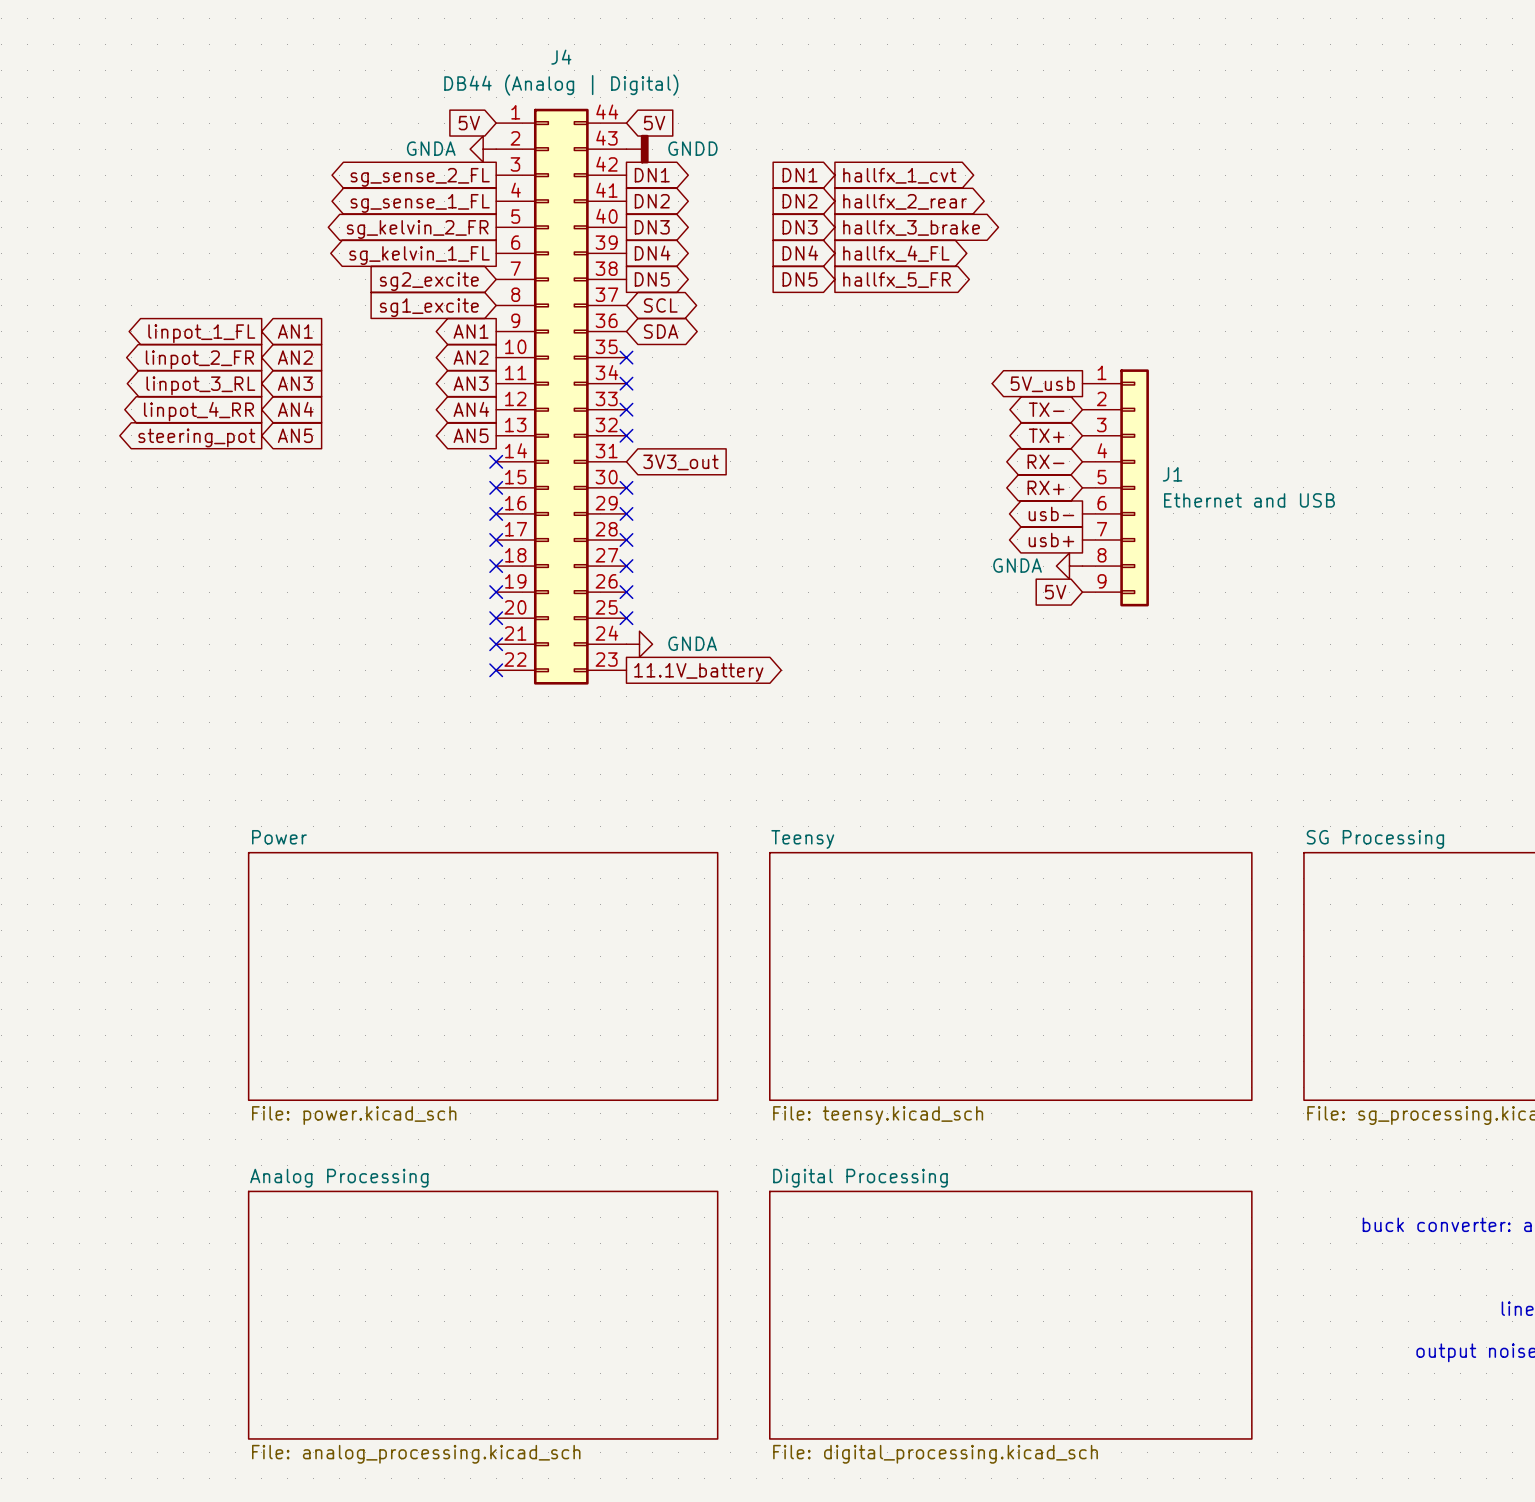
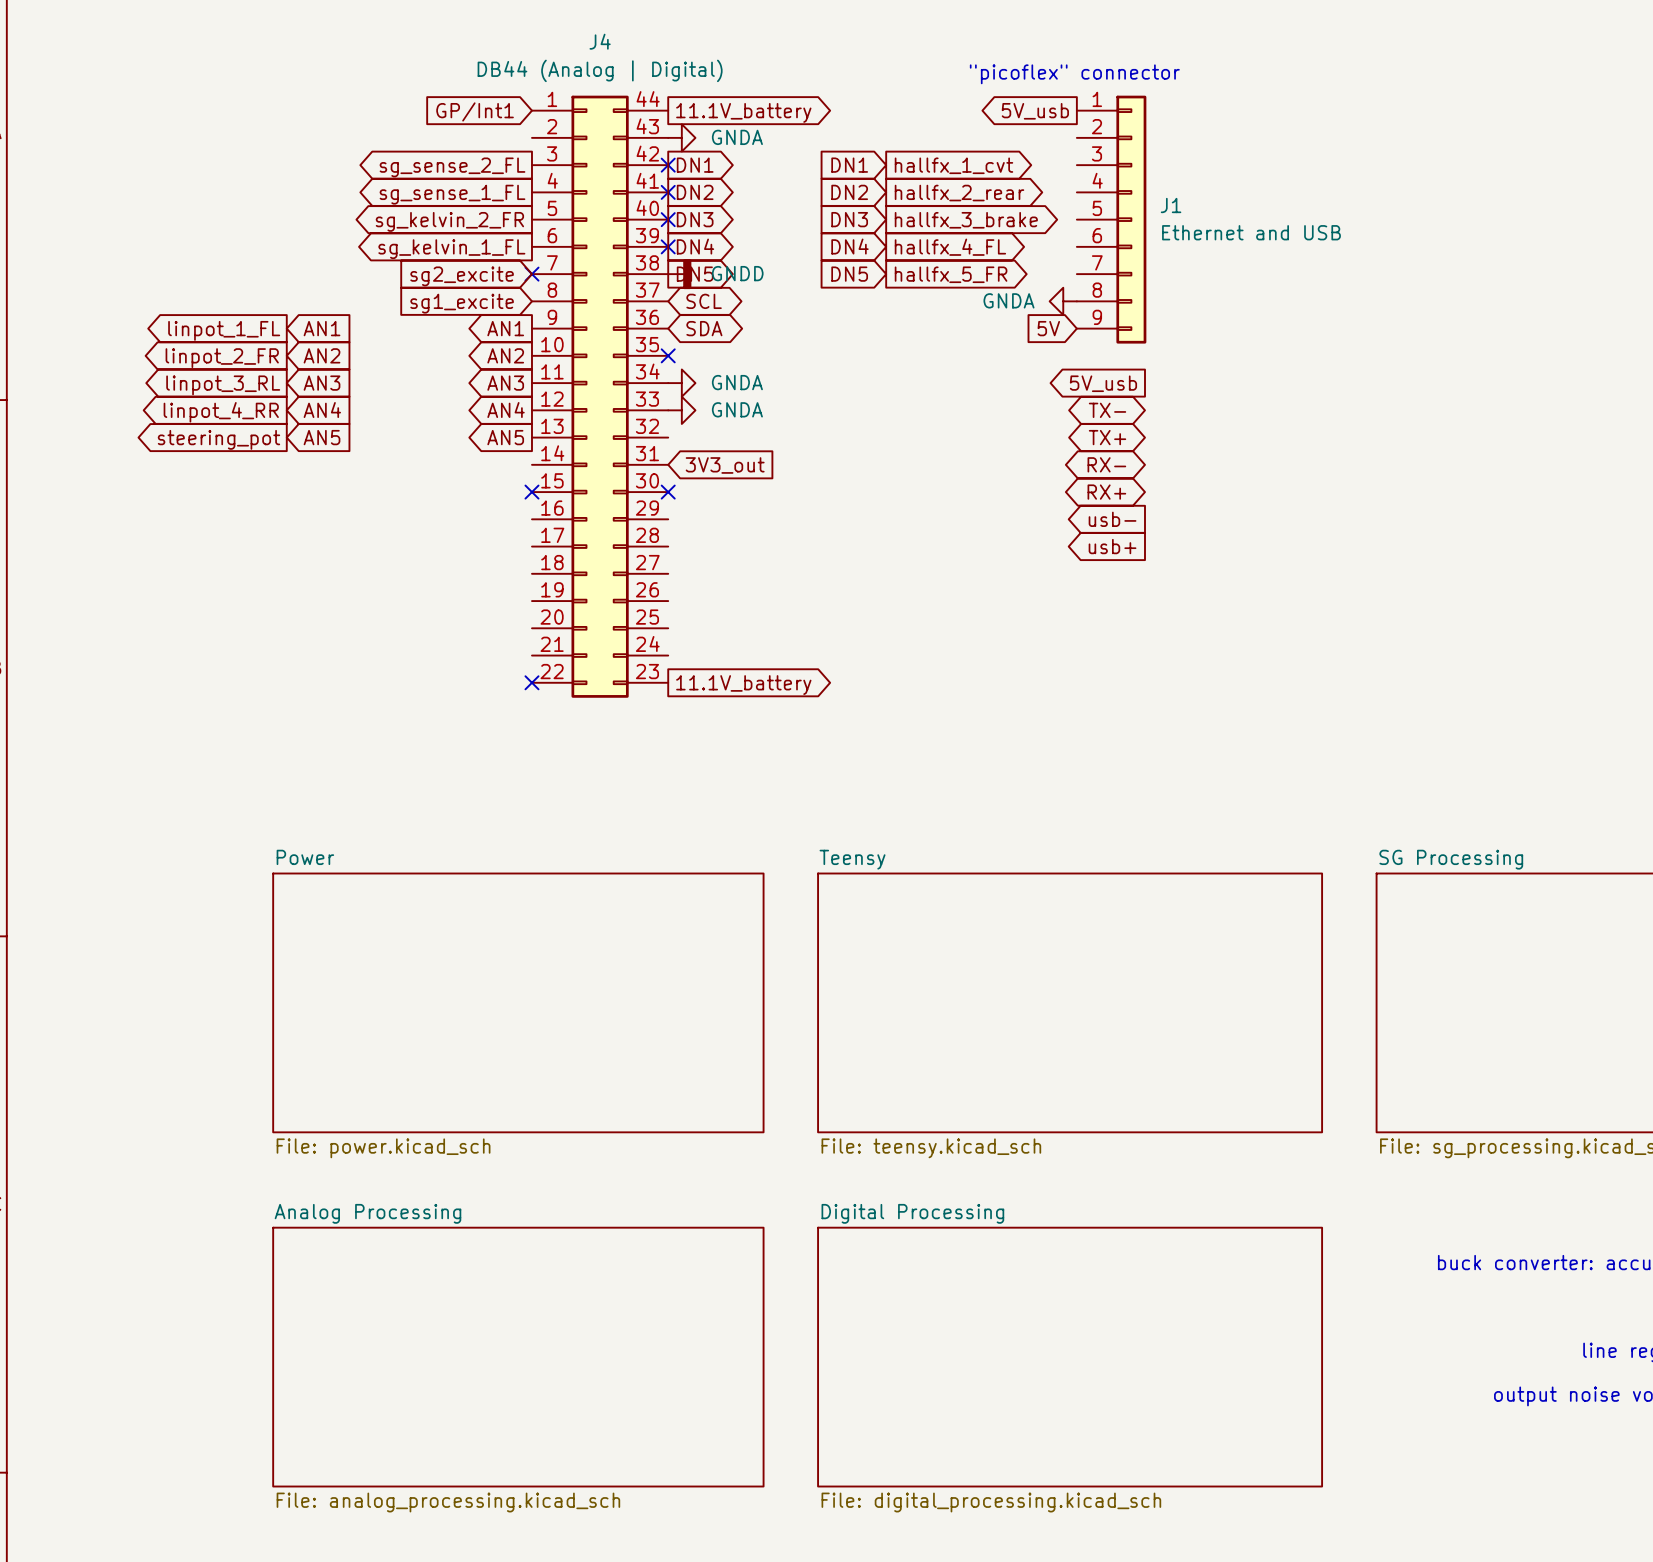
text: none -> "picoflex" connector (1074, 74)
global label: 5V (469, 123) -> GP/Int1 (475, 111)
global label shape: input (654, 123) -> output (743, 112)
global label: 5V (654, 123) -> 11.1V_battery (743, 112)
global label: none -> 5V_usb (1035, 111)
power symbol: GNDA (483, 149) -> none
power symbol: GNDD (637, 149) -> GNDA (681, 137)
no-connect mark: none -> (668, 165)
no-connect mark: none -> (668, 192)
no-connect mark: none -> (668, 219)
no-connect mark: none -> (668, 246)
no-connect mark: none -> (531, 274)
power symbol: none -> GNDD (679, 274)
power symbol: none -> GNDA (1063, 301)
global label: none -> 5V (1048, 328)
no-connect mark: (626, 383) -> none
power symbol: none -> GNDA (681, 383)
no-connect mark: (626, 409) -> none
power symbol: none -> GNDA (681, 410)
no-connect mark: (626, 435) -> none
no-connect mark: (496, 461) -> none
J1 position: (1115, 487) -> (1111, 219)
no-connect mark: (496, 513) -> none
no-connect mark: (626, 513) -> none
no-connect mark: (496, 539) -> none
no-connect mark: (626, 539) -> none
no-connect mark: (496, 566) -> none
no-connect mark: (626, 566) -> none
power symbol: GNDA (1069, 566) -> none
no-connect mark: (496, 592) -> none
no-connect mark: (626, 592) -> none
global label: 5V (1055, 592) -> none
no-connect mark: (496, 618) -> none
no-connect mark: (626, 618) -> none
no-connect mark: (496, 644) -> none
power symbol: GNDA (639, 644) -> none

